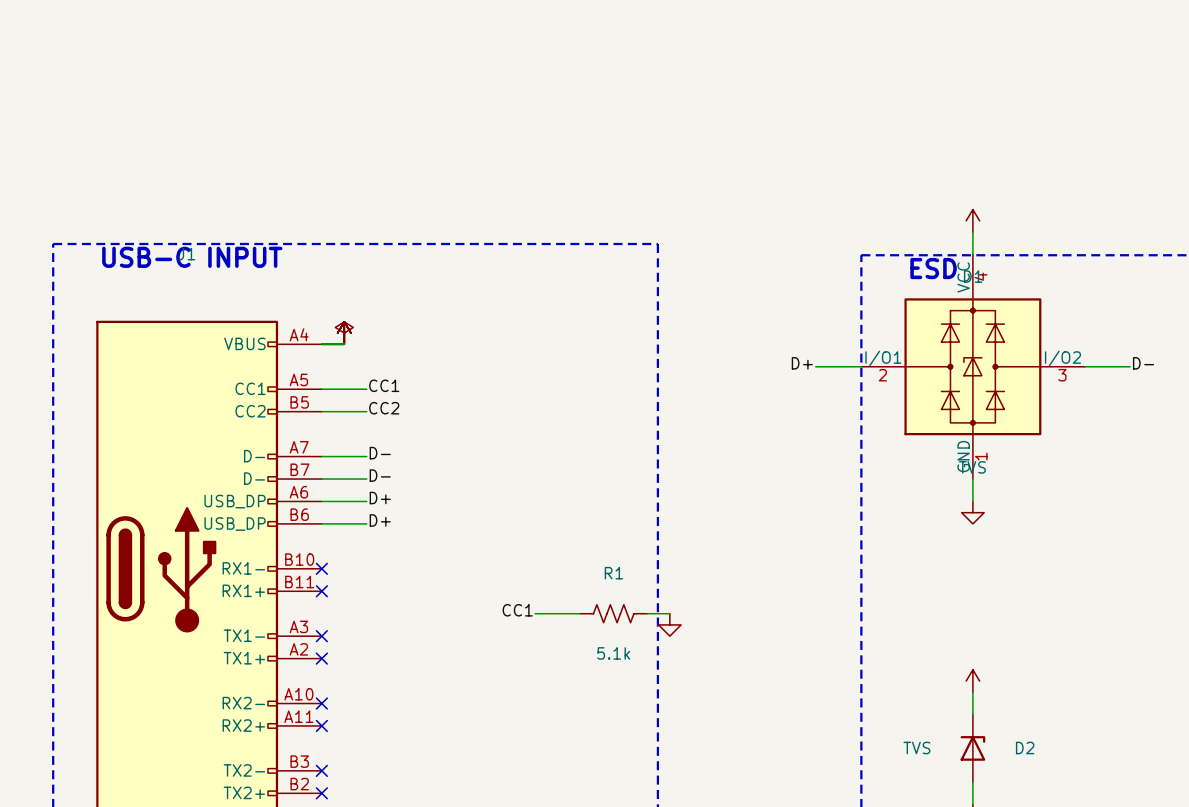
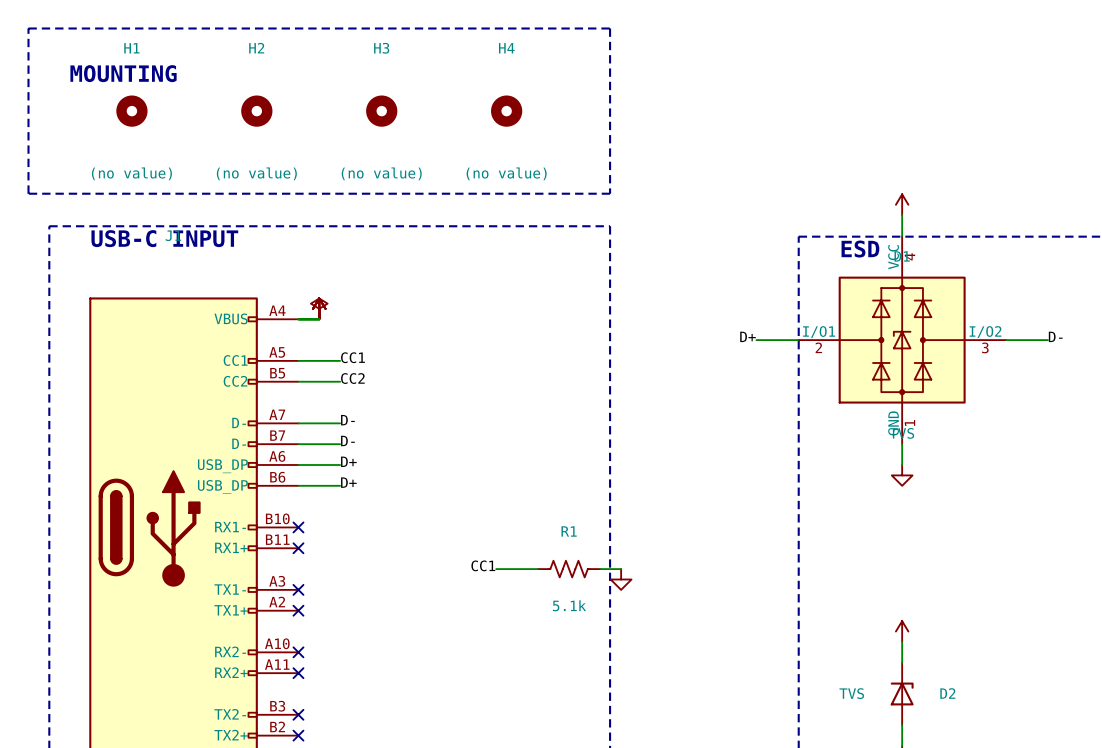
line: none -> (28, 28) (610, 28) (610, 193) (28, 193) (28, 28)
text: none -> MOUNTING (123, 73)
H1: none -> (no value) (131, 111)
H2: none -> (no value) (256, 111)
H3: none -> (no value) (381, 111)
H4: none -> (no value) (506, 111)

